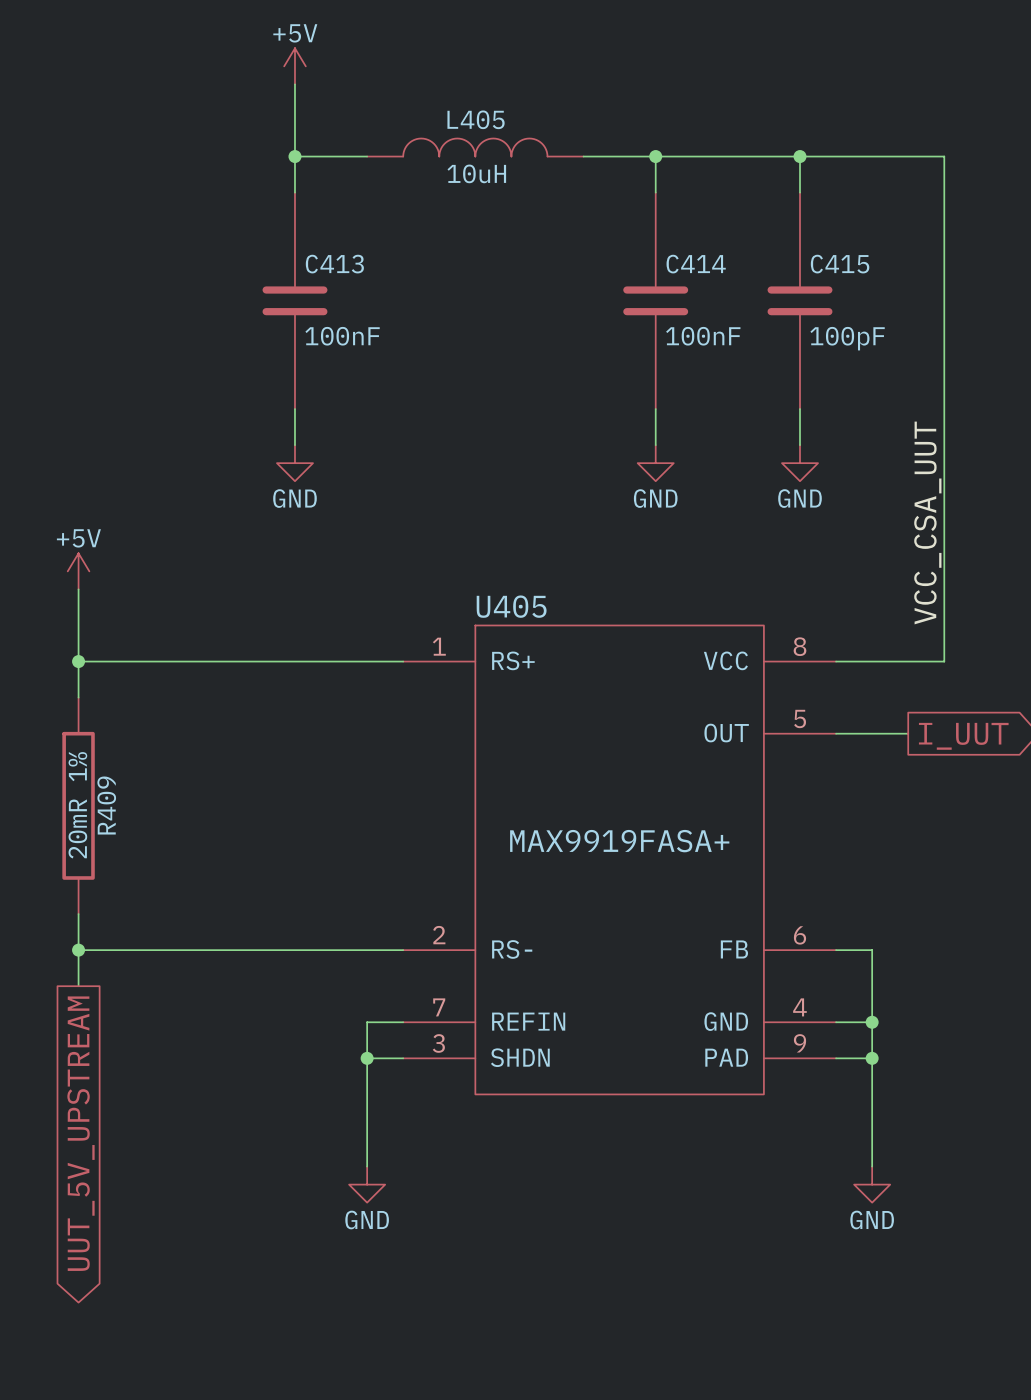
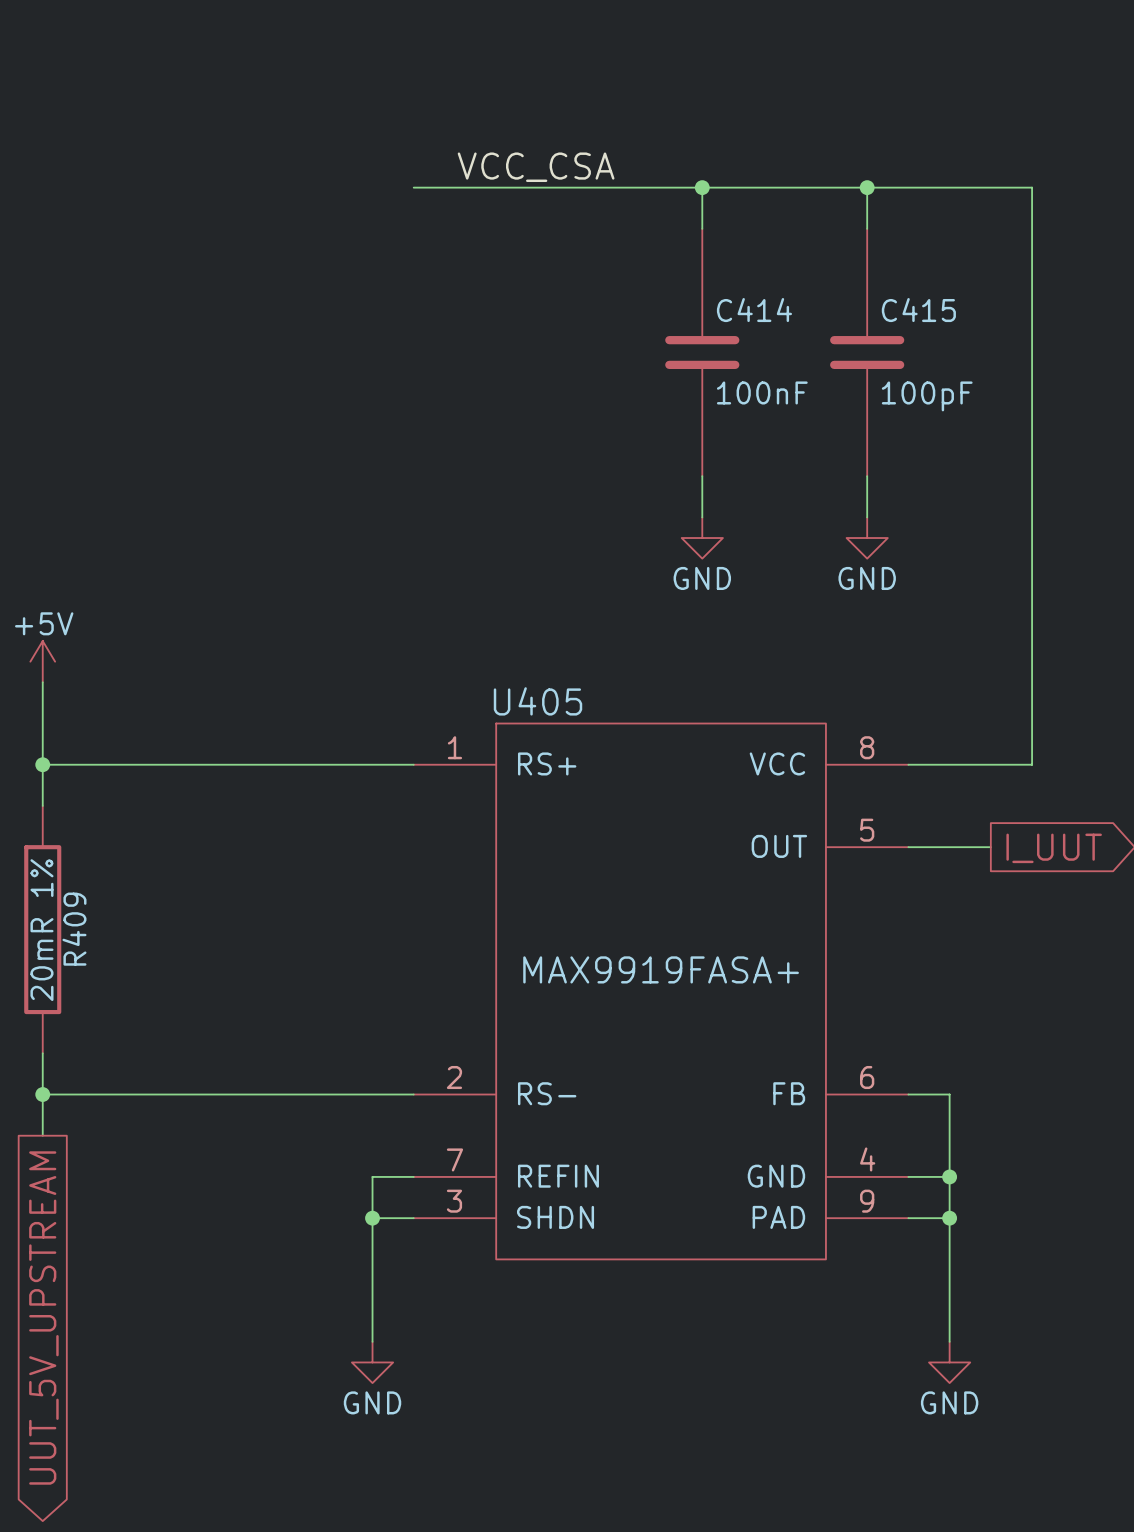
power symbol: +5V (294, 66) -> none
wire: (294, 84) (294, 192) -> none
label: none -> VCC_CSA (536, 167)
L405: 10uH (475, 147) -> none
wire: (294, 156) (367, 156) -> none
junction: (294, 156) -> none
wire: none -> (413, 187) (619, 187)
C413: 100nF (294, 300) -> none
wire: (294, 409) (294, 445) -> none
power symbol: GND (294, 463) -> none
label: VCC_CSA_UUT (927, 522) -> none

